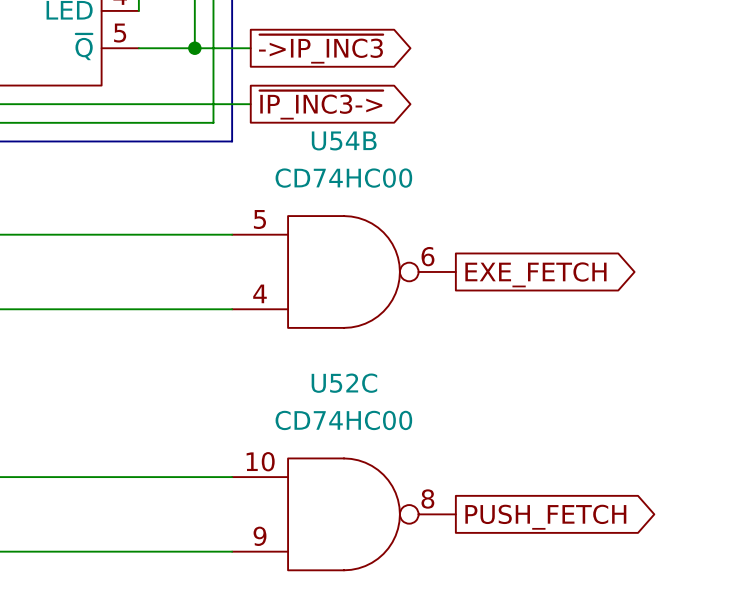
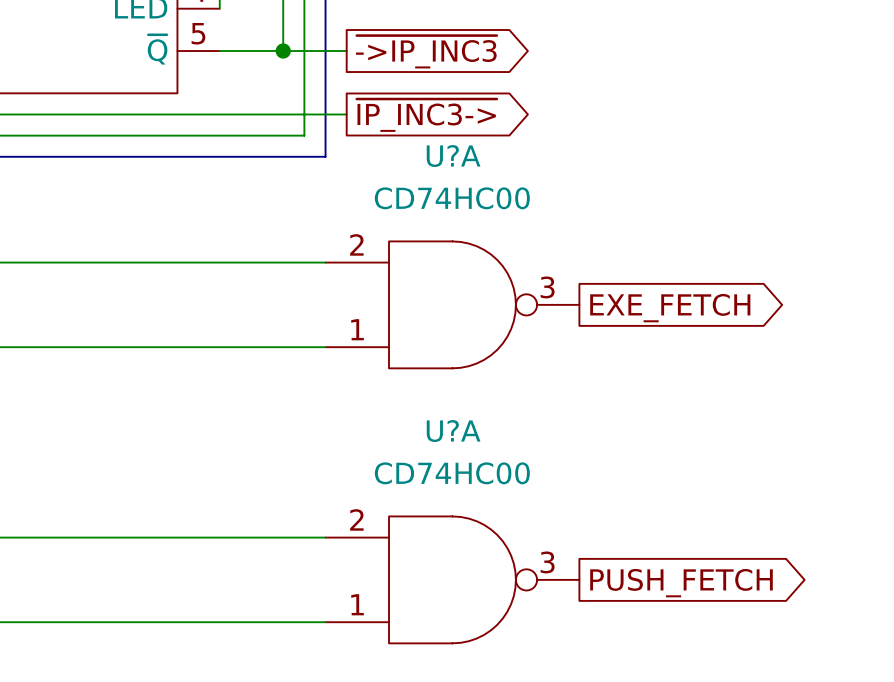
U54B name: U54B (344, 140) -> U?A (453, 156)
U54B pin number: 5 (259, 219) -> 2 (356, 244)
U54B pin number: 6 (427, 256) -> 3 (547, 287)
U54B pin number: 4 (260, 293) -> 1 (357, 329)
U52C name: U52C (344, 383) -> U?A (453, 431)
U52C pin number: 10 (260, 461) -> 2 (356, 519)
U52C pin number: 8 (427, 499) -> 3 (547, 562)
U52C pin number: 9 (260, 536) -> 1 (357, 604)

